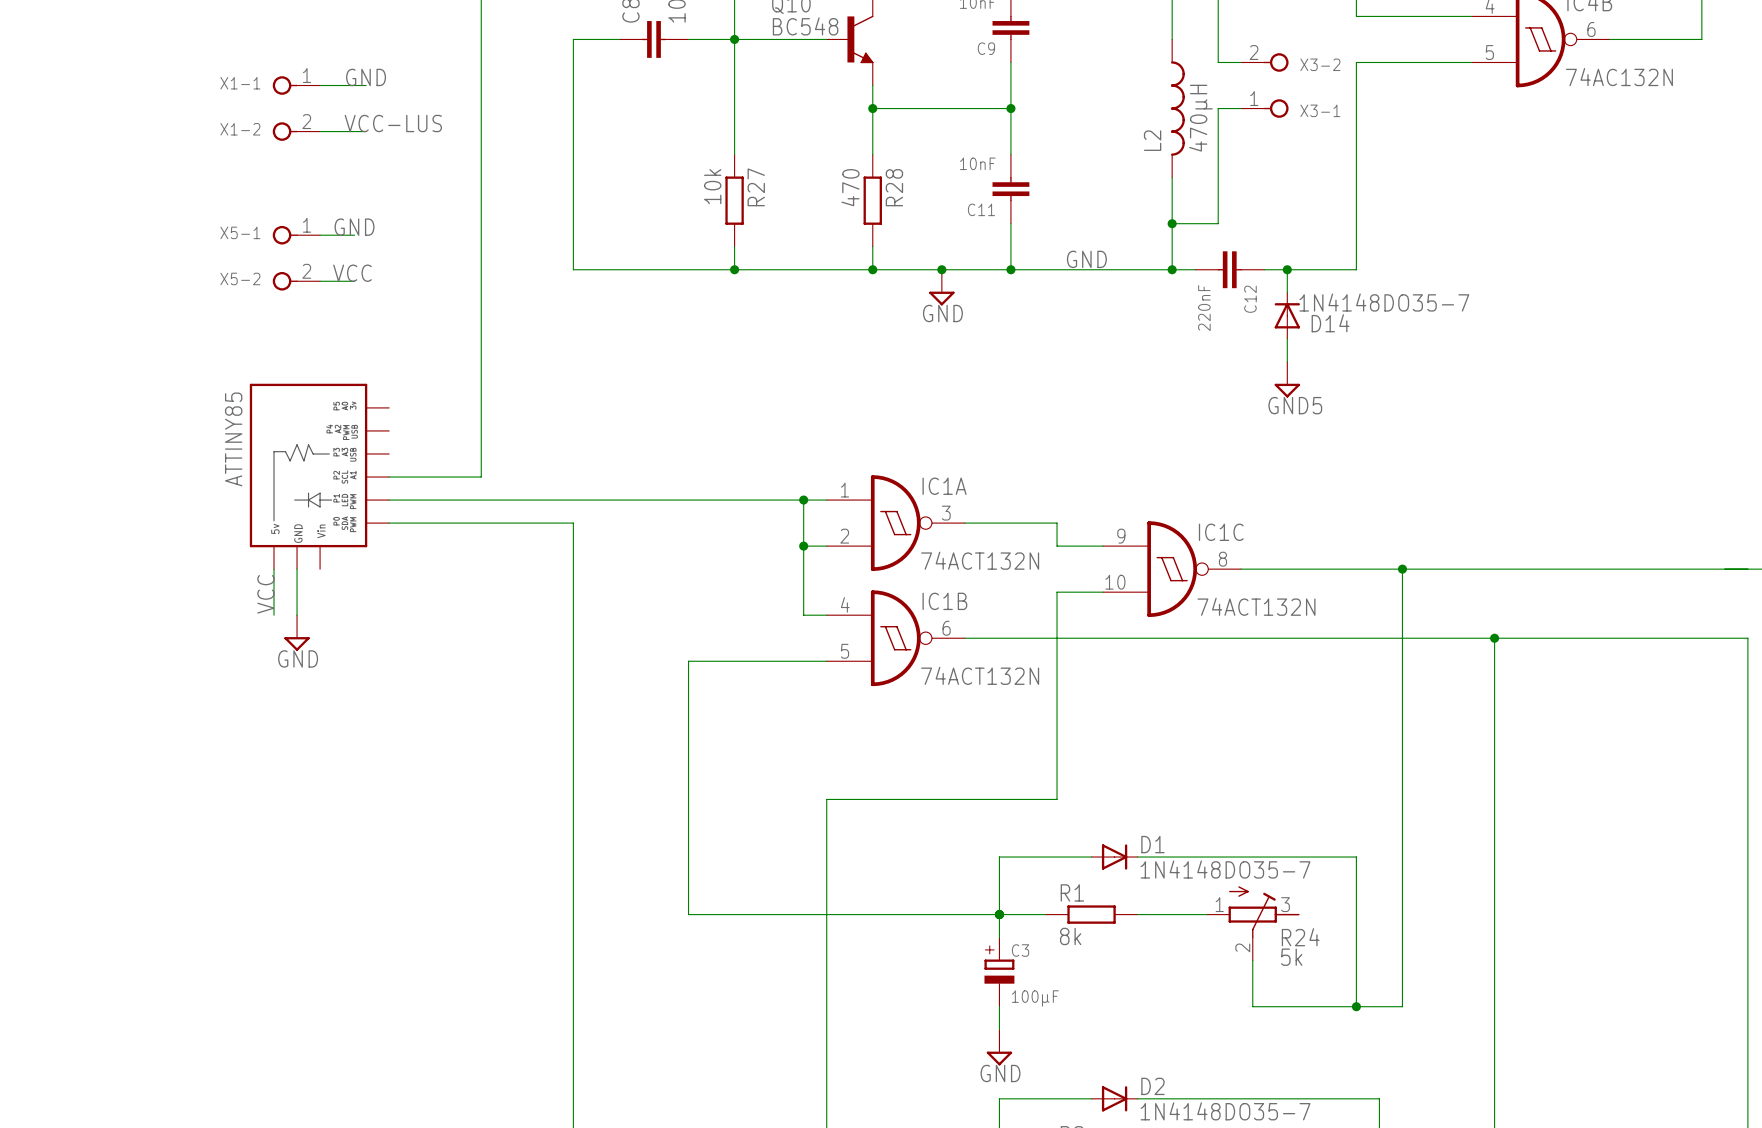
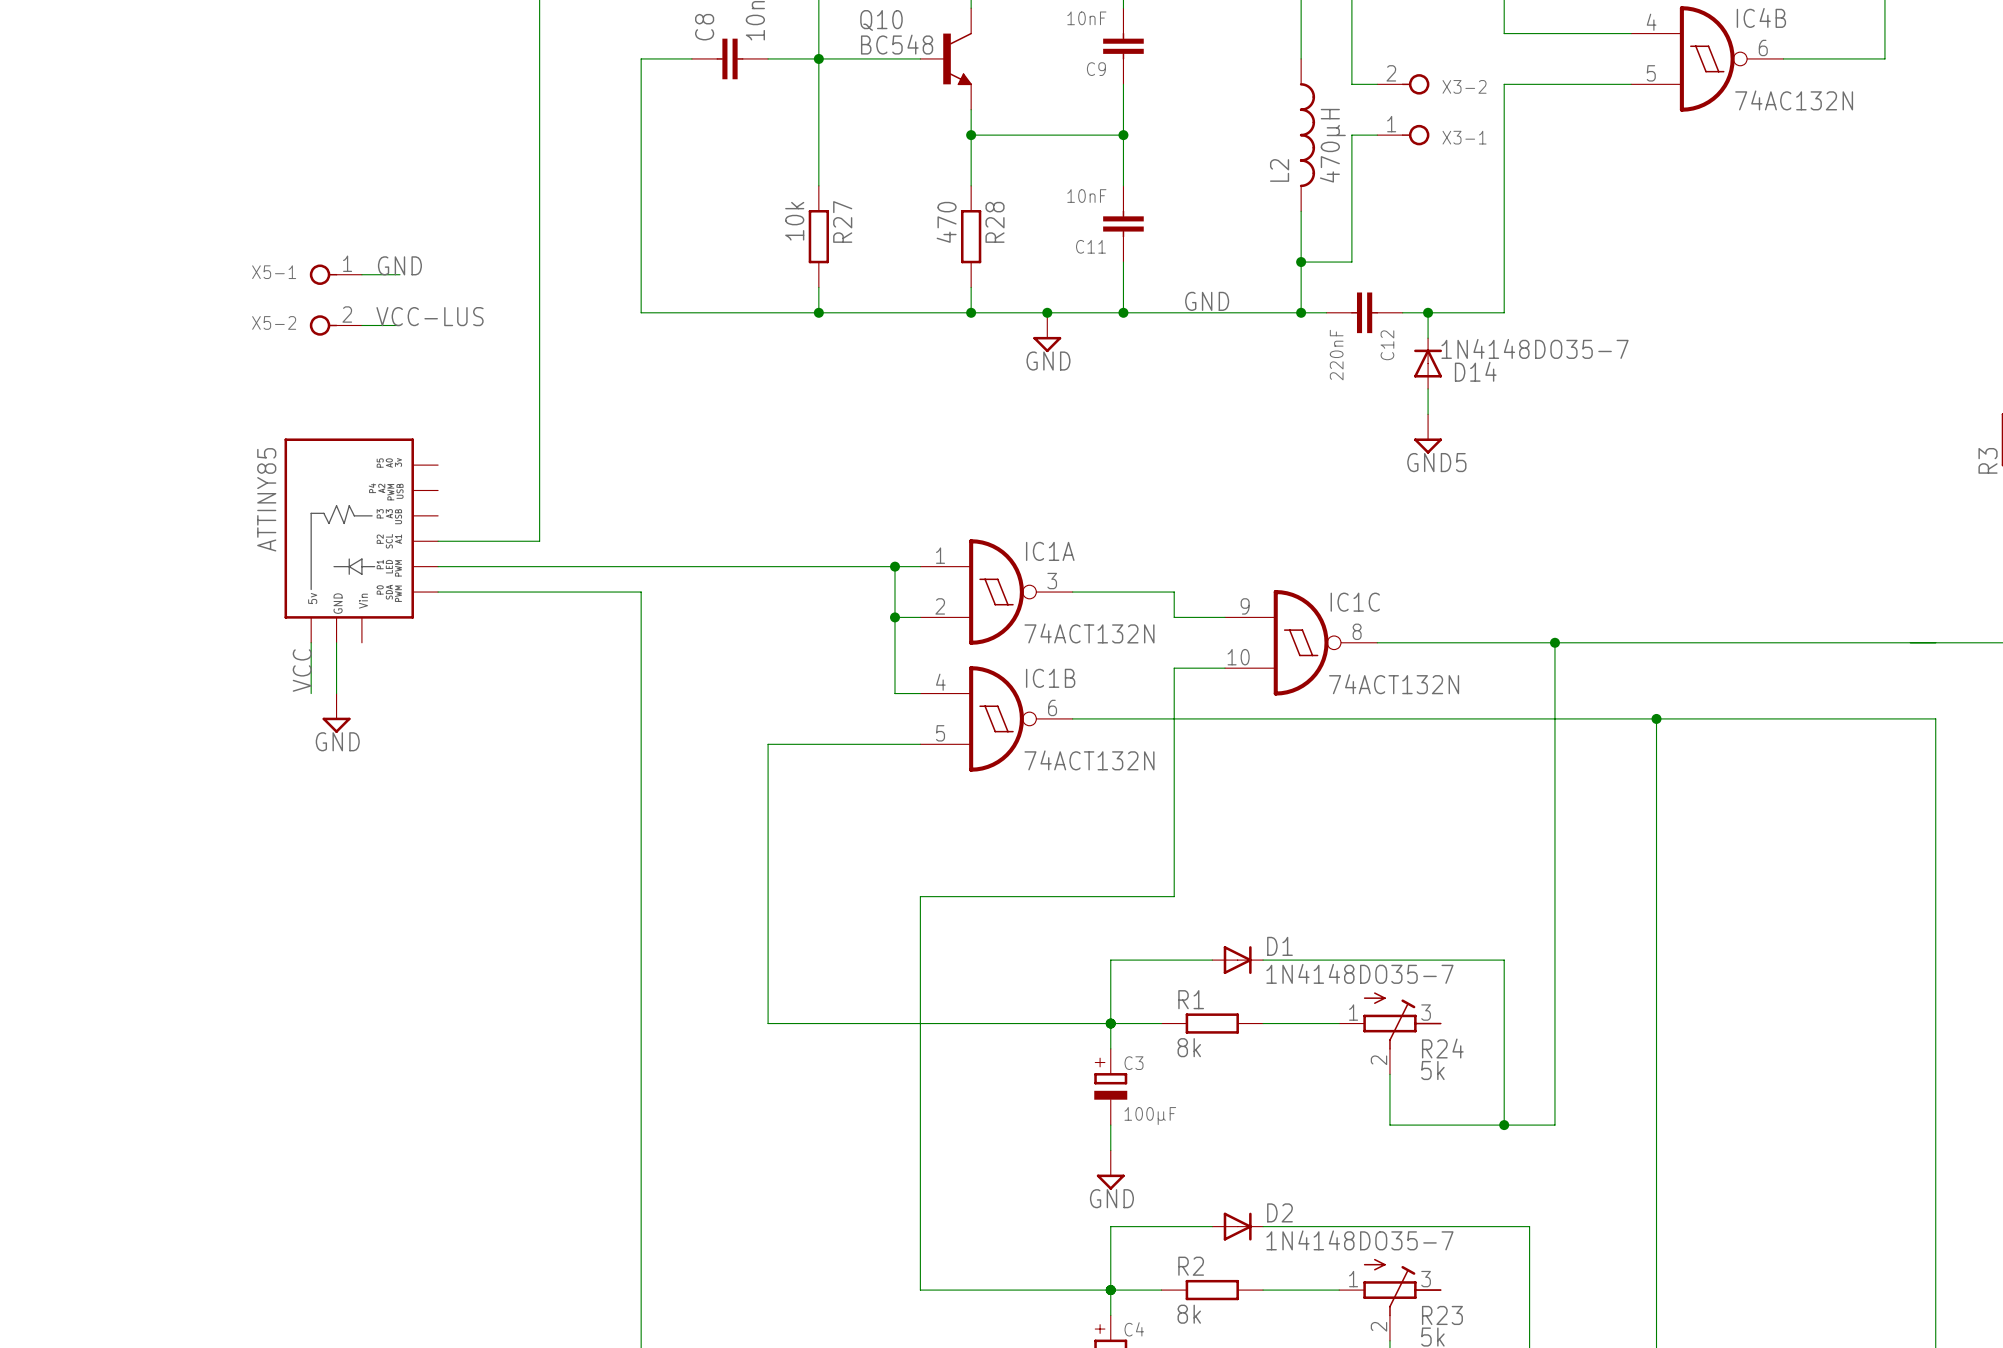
label: GND (366, 77) -> none
X1-1: (296, 85) -> none
wire: (320, 85) (366, 85) -> none
label: VCC-LUS (393, 123) -> none
X1-2: (296, 131) -> none
wire: (320, 131) (366, 131) -> none
label: VCC (352, 273) -> VCC-LUS (430, 316)

